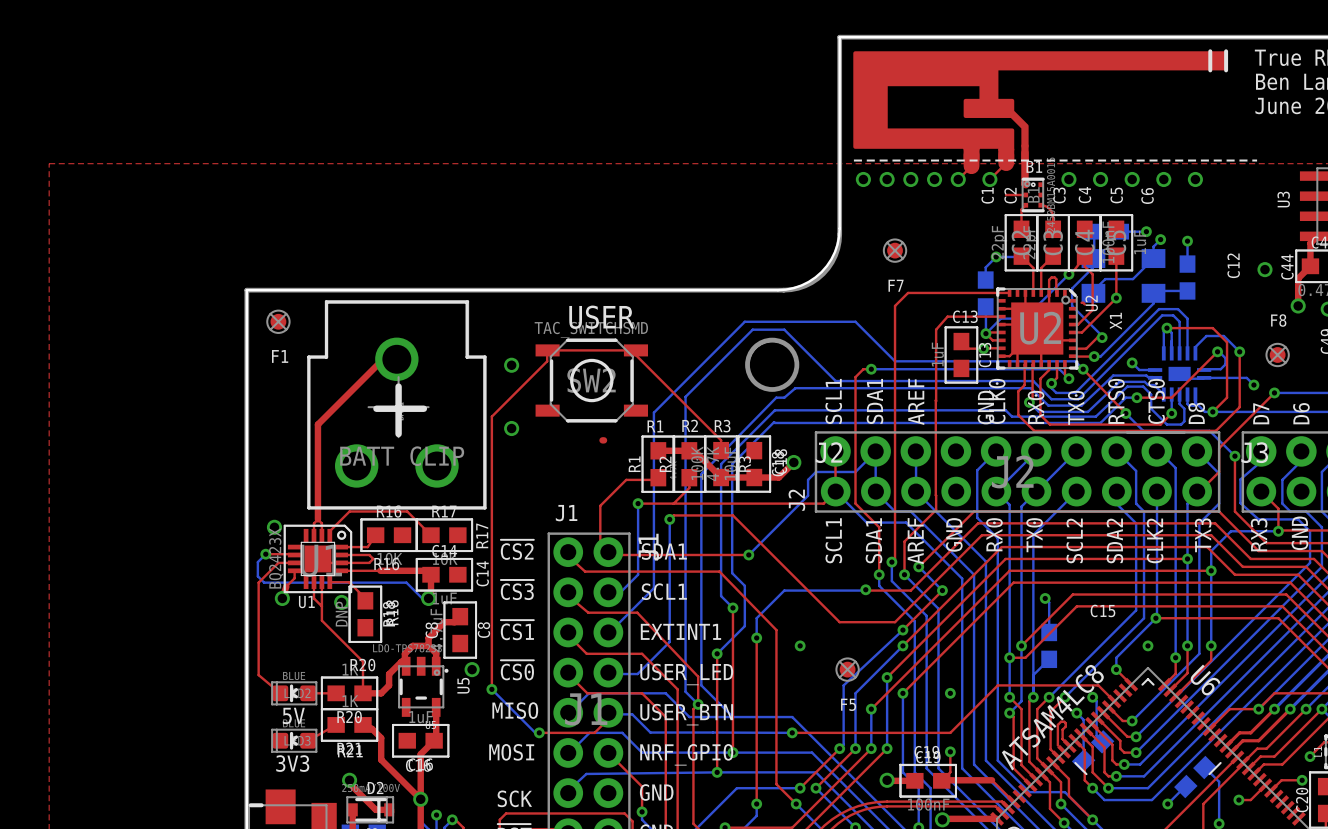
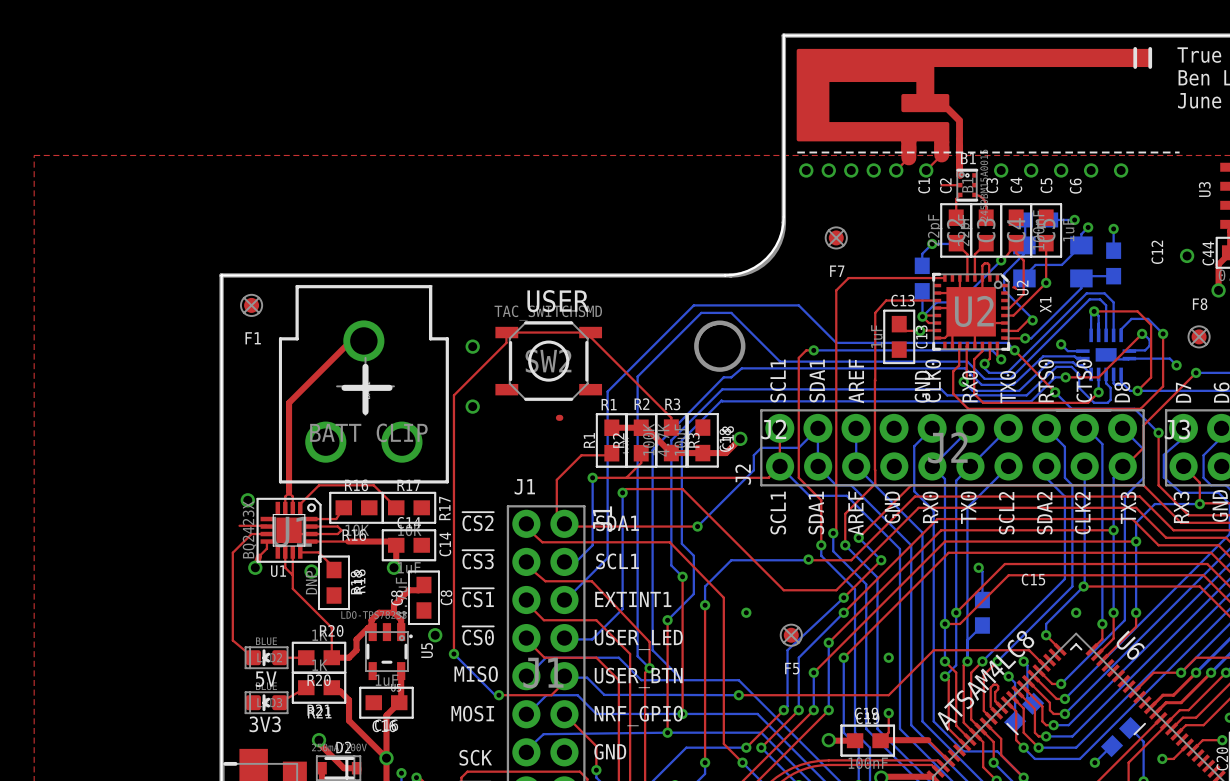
bottom track: (265, 554) (257, 562) (257, 576) (264, 582) (406, 582) (422, 598) (428, 598) -> none
via: (265, 554) -> none

